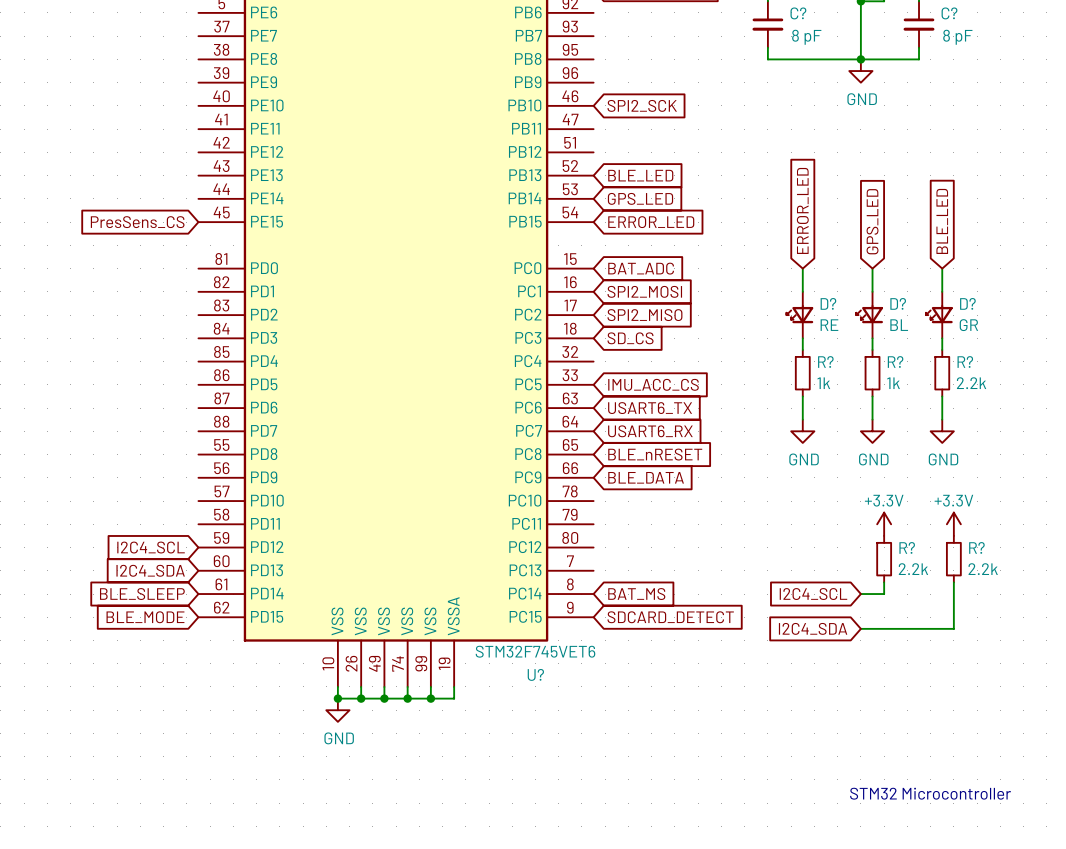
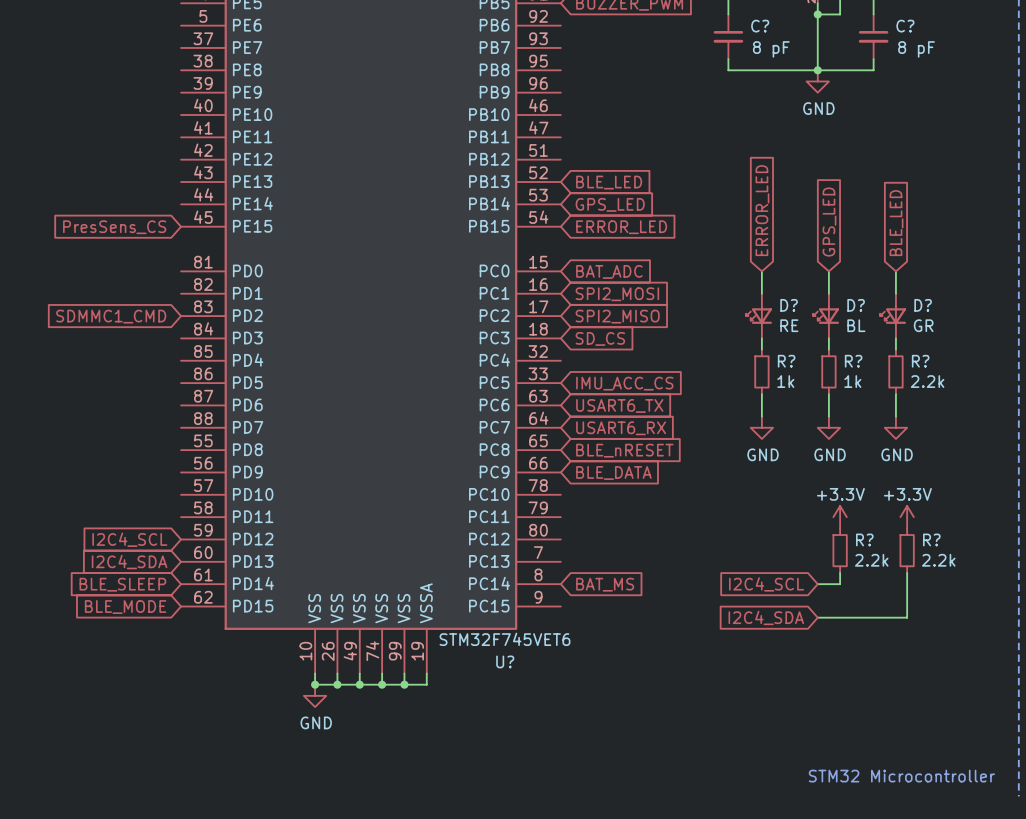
global label: SPI2_SCK (642, 105) -> none
global label: none -> SDMMC1_CMD (111, 316)
global label: SDCARD_DETECT (670, 617) -> none

